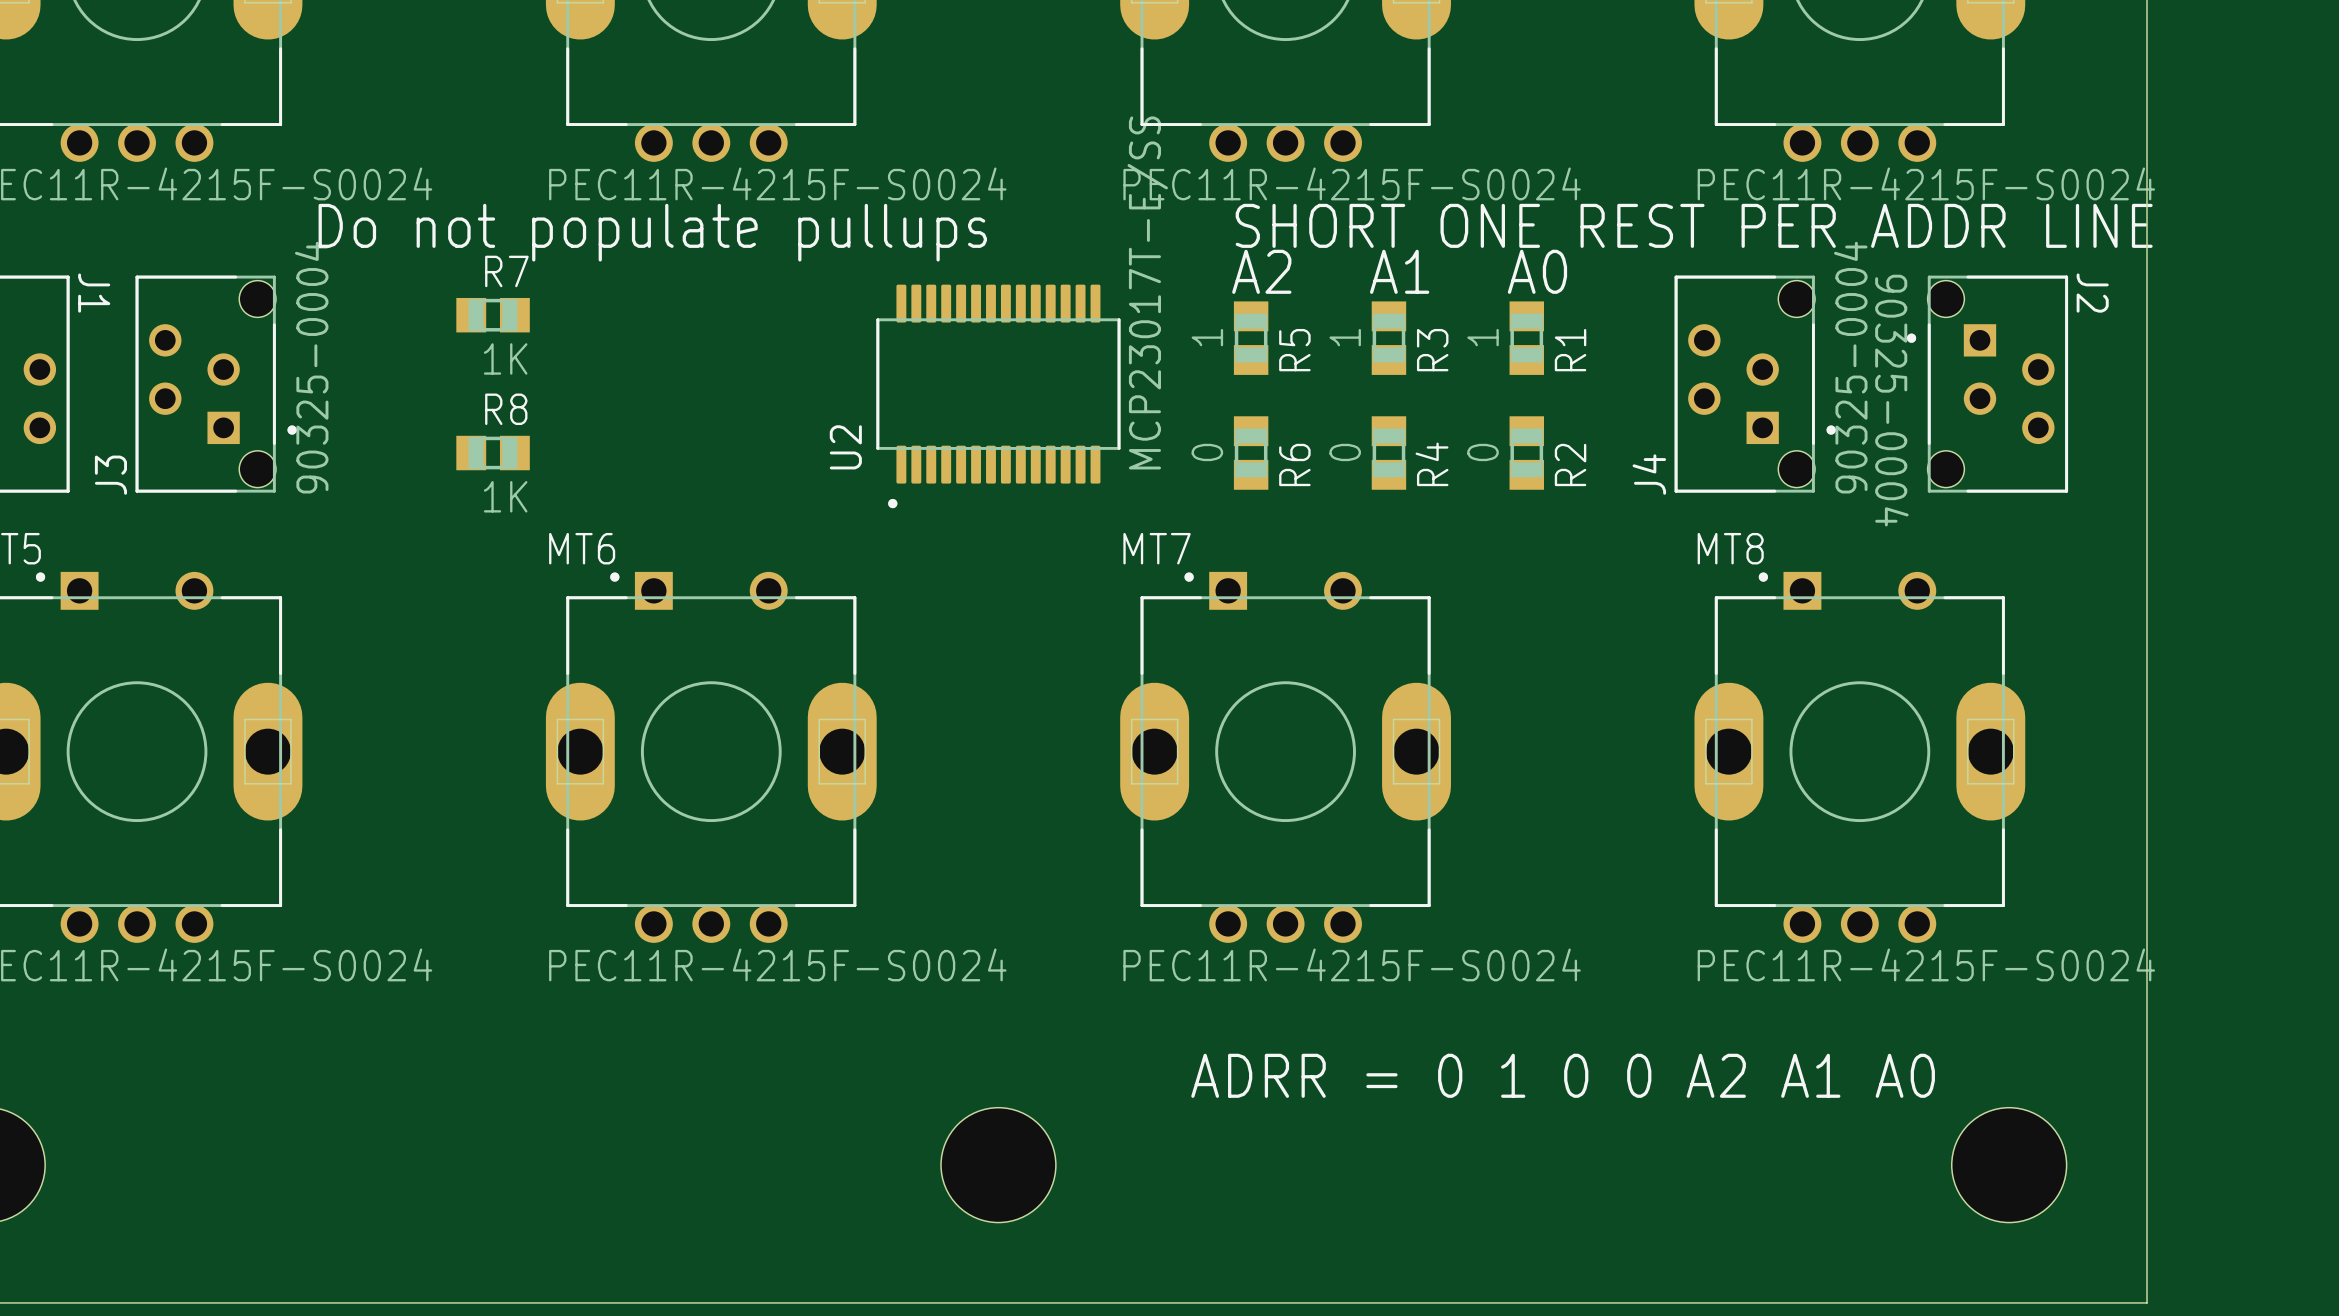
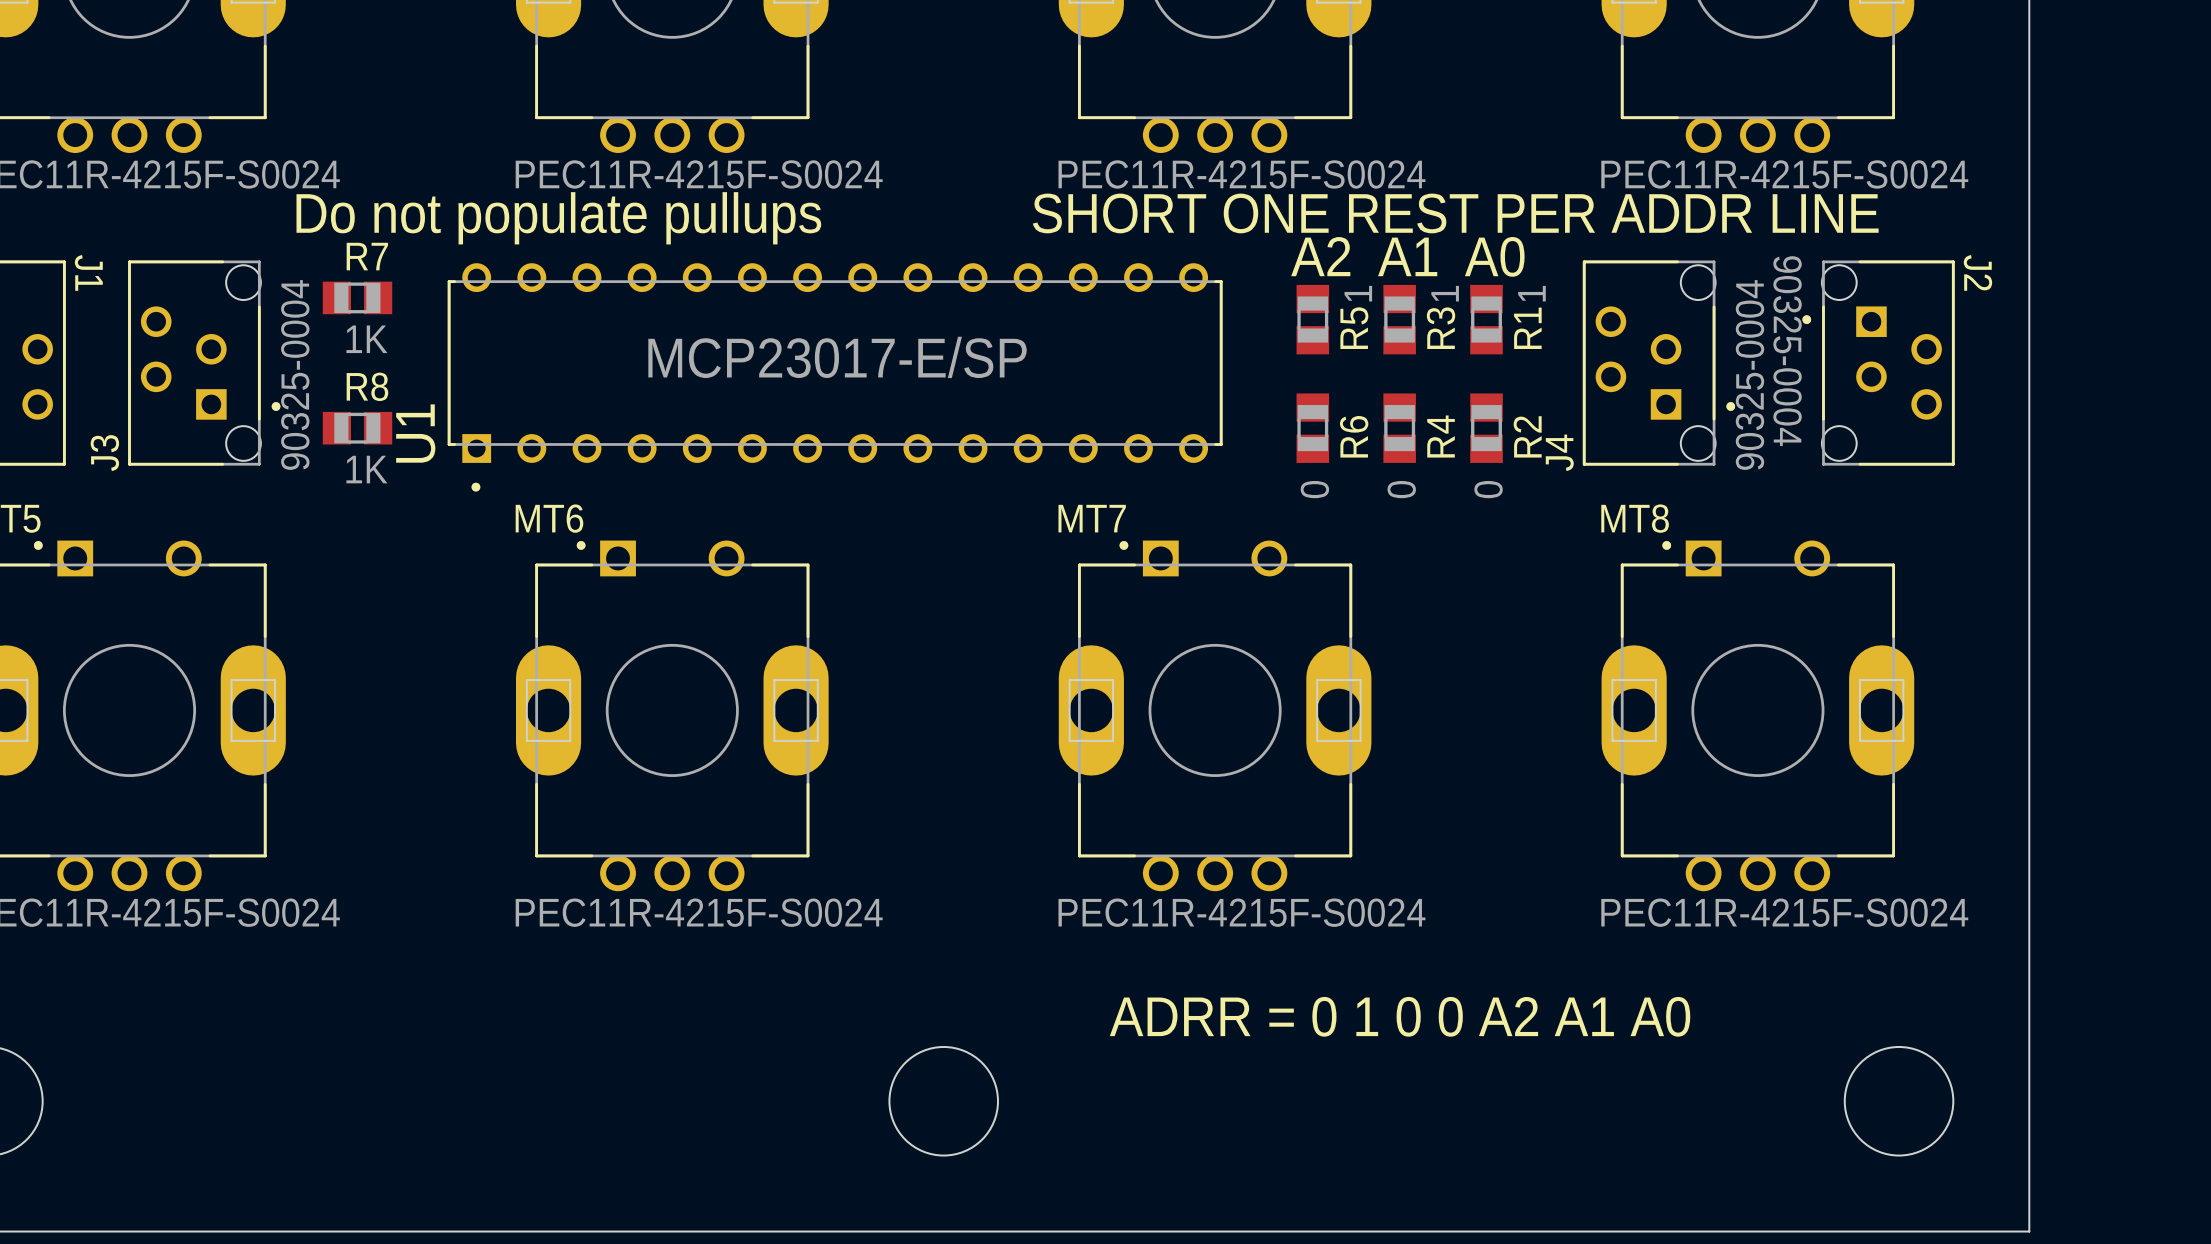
text position: SHORT ONE REST PER ADDR LINE (1694, 225) -> SHORT ONE REST PER ADDR LINE (1455, 213)
text: A2 (1261, 271) -> none
text: A1 (1399, 271) -> A2 (1320, 256)
text: none -> A1 (1407, 256)
text position: A0 (1537, 271) -> A0 (1494, 256)
R7 position: (493, 315) -> (357, 297)
R3 value position: 1 (1345, 337) -> 1 (1358, 293)
R1 value position: 1 (1483, 337) -> 1 (1532, 293)
R5: 1 (1251, 338) -> none
R3: none -> 1 (1399, 319)
R1 position: (1526, 338) -> (1486, 319)
R3 name: R3 (1432, 350) -> R5 (1354, 328)
U2: MCP23017T-E/SS (998, 396) -> none
U1: none -> MCP23017-E/SP (835, 377)
R4 value position: 0 (1345, 452) -> 0 (1314, 489)
R2 value position: 0 (1483, 452) -> 0 (1488, 489)
R8 position: (493, 453) -> (357, 428)
R6: 0 (1251, 453) -> none
R4: none -> 0 (1399, 428)
R2 position: (1526, 453) -> (1486, 428)
R4 name: R4 (1432, 464) -> R6 (1354, 436)

